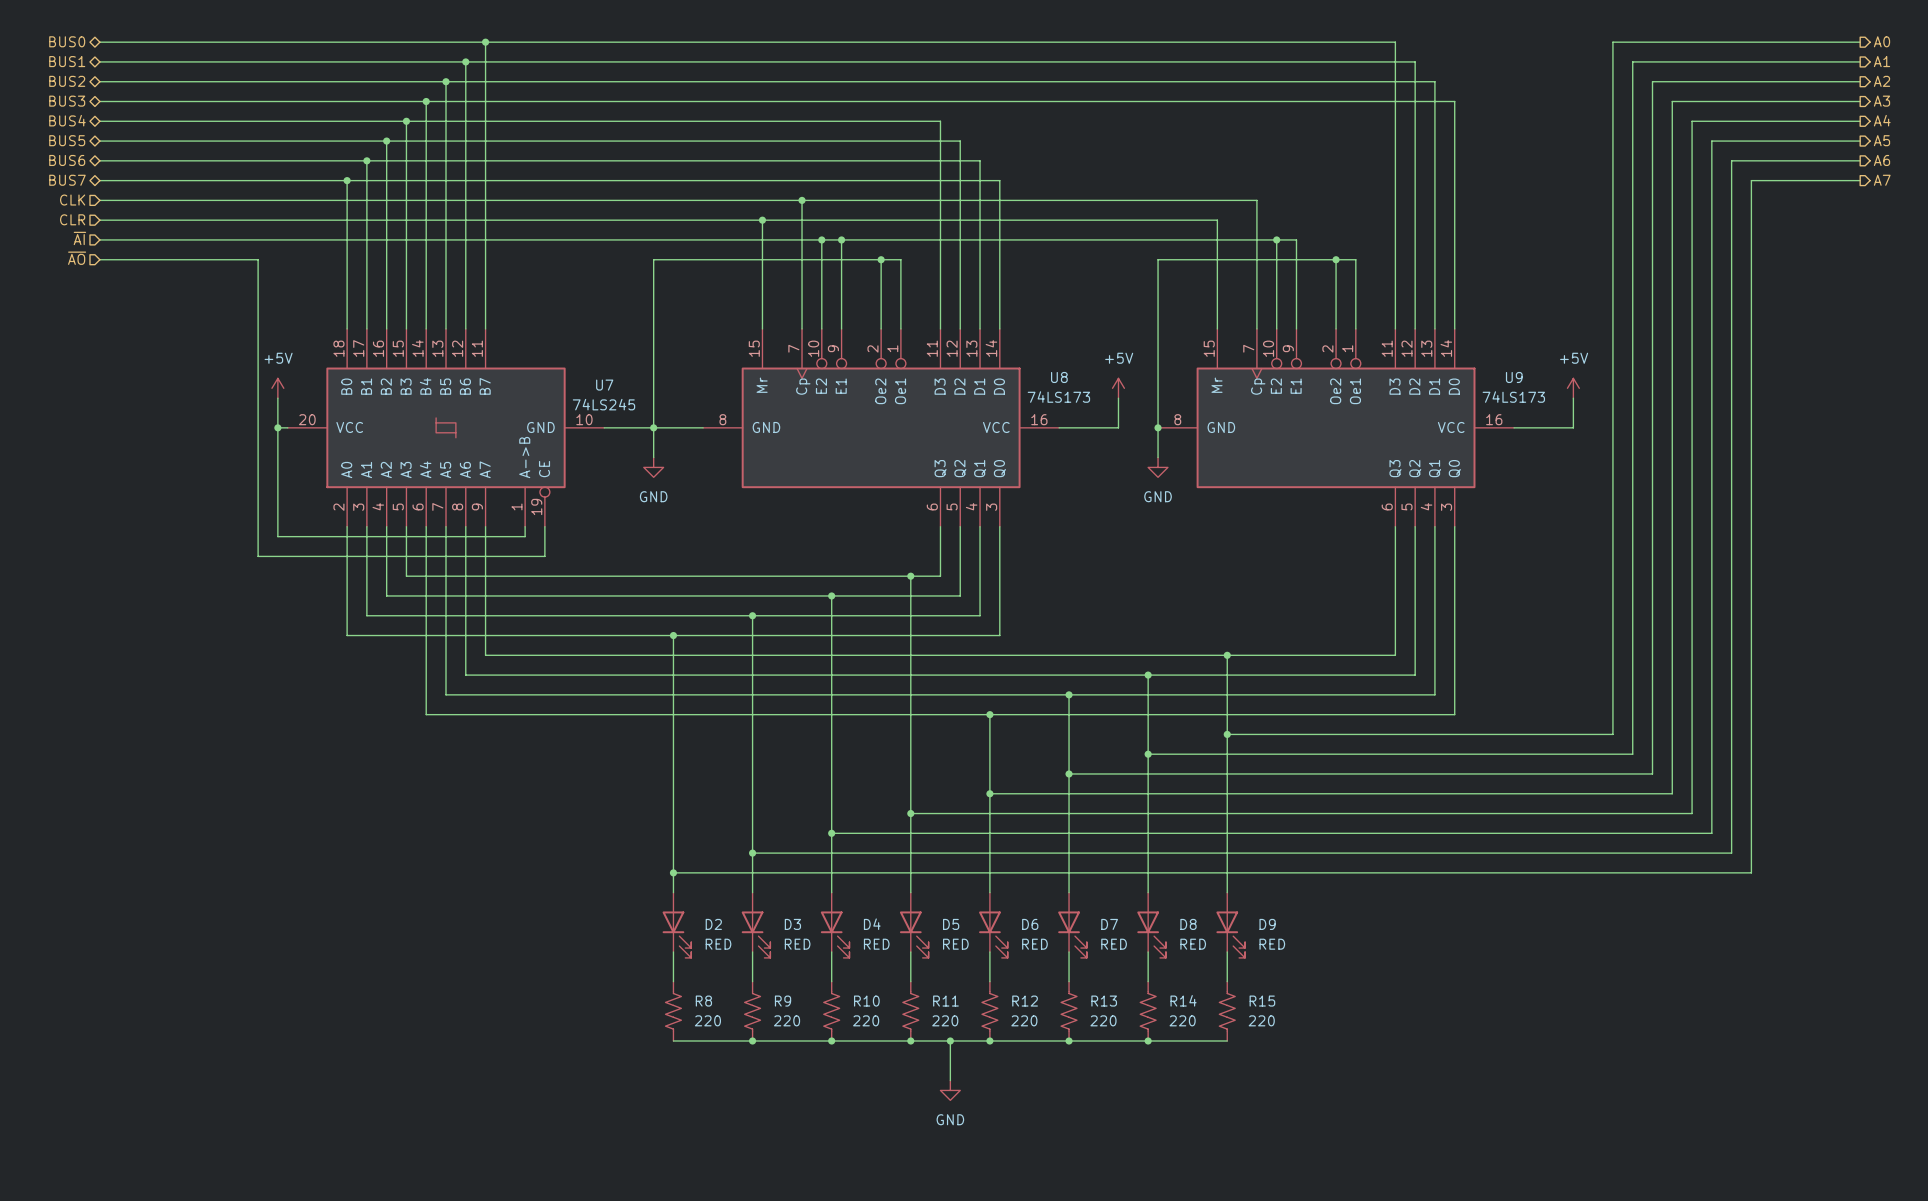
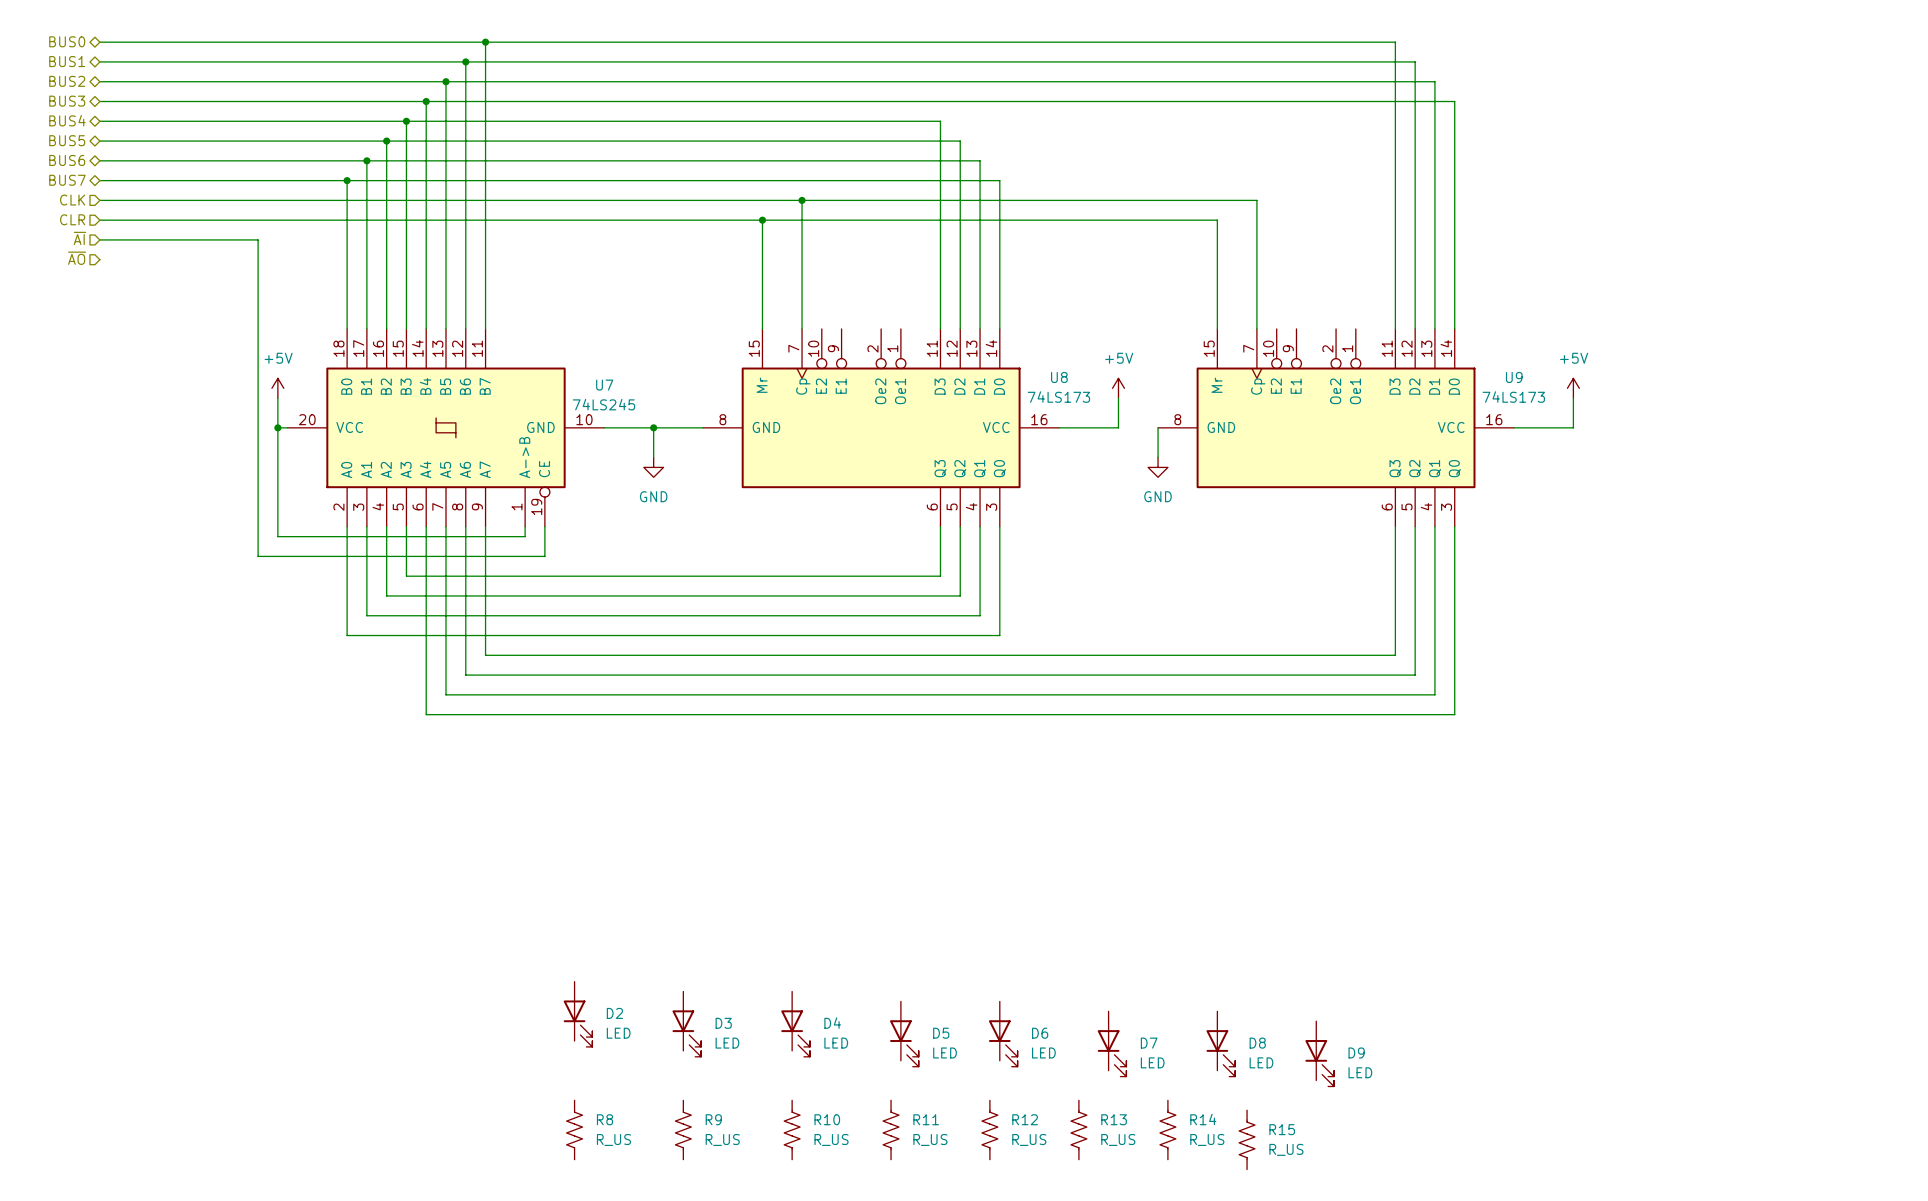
hierarchical label: A0 (1881, 41) -> none
wire: (1860, 42) (1612, 42) (1612, 734) (1227, 734) -> none
wire: (1860, 61) (1632, 61) (1632, 754) (1148, 754) -> none
hierarchical label: A1 (1881, 61) -> none
wire: (1860, 81) (1652, 81) (1652, 773) (1069, 773) -> none
hierarchical label: A2 (1881, 81) -> none
wire: (1860, 101) (1672, 101) (1672, 793) (989, 793) -> none
hierarchical label: A3 (1881, 101) -> none
hierarchical label: A4 (1882, 120) -> none
wire: (1860, 121) (1692, 121) (1692, 813) (910, 813) -> none
hierarchical label: A5 (1881, 140) -> none
wire: (1860, 141) (1711, 141) (1711, 833) (831, 833) -> none
wire: (1860, 160) (1731, 160) (1731, 853) (752, 853) -> none
hierarchical label: A6 (1881, 160) -> none
wire: (1860, 180) (1751, 180) (1751, 872) (673, 872) -> none
hierarchical label: A7 (1882, 180) -> none
wire: (258, 239) (1296, 239) (1296, 328) -> none
wire: (821, 239) (821, 328) -> none
junction: (821, 239) -> none
wire: (841, 239) (841, 328) -> none
junction: (841, 239) -> none
wire: (1276, 239) (1276, 328) -> none
junction: (1276, 239) -> none
wire: (99, 259) (258, 259) -> (258, 239) (258, 259)
wire: (881, 259) (881, 328) -> none
junction: (881, 259) -> none
wire: (1336, 259) (1336, 328) -> none
junction: (1336, 259) -> none
wire: (900, 328) (900, 259) (653, 259) (653, 427) -> none
wire: (1355, 328) (1355, 259) (1158, 259) (1158, 427) -> none
junction: (1158, 427) -> none
wire: (910, 576) (910, 892) -> none
junction: (910, 576) -> none
wire: (831, 595) (831, 892) -> none
junction: (831, 595) -> none
wire: (752, 615) (752, 892) -> none
junction: (752, 615) -> none
wire: (673, 635) (673, 892) -> none
junction: (673, 635) -> none
wire: (1227, 655) (1227, 892) -> none
junction: (1227, 655) -> none
wire: (1148, 675) (1148, 892) -> none
junction: (1148, 675) -> none
wire: (1069, 694) (1069, 892) -> none
junction: (1069, 694) -> none
wire: (989, 714) (989, 892) -> none
junction: (989, 714) -> none
junction: (1227, 734) -> none
junction: (1148, 754) -> none
junction: (1069, 773) -> none
junction: (989, 793) -> none
junction: (910, 813) -> none
junction: (831, 833) -> none
junction: (752, 853) -> none
junction: (673, 872) -> none
D2 position: (676, 925) -> (578, 1014)
D3 position: (756, 925) -> (686, 1024)
D4 position: (835, 925) -> (795, 1024)
D5 position: (914, 925) -> (904, 1034)
D6 position: (993, 925) -> (1003, 1034)
D7 position: (1072, 925) -> (1112, 1043)
D8 position: (1151, 925) -> (1220, 1043)
D9 position: (1230, 925) -> (1319, 1053)
D2 value: RED (718, 944) -> LED (618, 1033)
D3 value: RED (797, 944) -> LED (727, 1043)
D4 value: RED (876, 944) -> LED (836, 1043)
D5 value: RED (955, 944) -> LED (945, 1052)
D6 value: RED (1034, 944) -> LED (1043, 1052)
D7 value: RED (1114, 944) -> LED (1152, 1062)
D8 value: RED (1193, 944) -> LED (1261, 1062)
D9 value: RED (1272, 944) -> LED (1360, 1072)
wire: (673, 951) (673, 981) -> none
wire: (752, 951) (752, 981) -> none
wire: (831, 951) (831, 981) -> none
wire: (910, 951) (910, 981) -> none
wire: (989, 951) (989, 981) -> none
wire: (1069, 951) (1069, 981) -> none
wire: (1148, 951) (1148, 981) -> none
wire: (1227, 951) (1227, 981) -> none
R8 position: (673, 1011) -> (574, 1130)
R9 position: (752, 1011) -> (683, 1130)
R10 position: (831, 1011) -> (792, 1130)
R11 position: (910, 1011) -> (891, 1130)
R12 position: (989, 1011) -> (989, 1130)
R13 position: (1069, 1011) -> (1078, 1130)
R14 position: (1148, 1011) -> (1167, 1130)
R15 position: (1227, 1011) -> (1247, 1139)
R8 value: 220 (707, 1020) -> R_US (613, 1139)
R9 value: 220 (787, 1020) -> R_US (722, 1139)
R10 value: 220 (866, 1020) -> R_US (831, 1139)
R11 value: 220 (945, 1020) -> R_US (930, 1139)
R12 value: 220 (1024, 1020) -> R_US (1029, 1139)
R13 value: 220 (1103, 1020) -> R_US (1118, 1139)
R14 value: 220 (1182, 1020) -> R_US (1207, 1139)
R15 value: 220 (1261, 1020) -> R_US (1286, 1149)
wire: (673, 1040) (1227, 1040) -> none
junction: (752, 1040) -> none
junction: (831, 1040) -> none
junction: (910, 1040) -> none
wire: (950, 1040) (950, 1080) -> none
junction: (950, 1040) -> none
junction: (989, 1040) -> none
junction: (1069, 1040) -> none
junction: (1148, 1040) -> none
power symbol: GND (950, 1090) -> none

